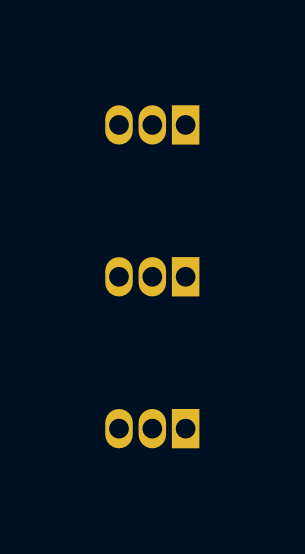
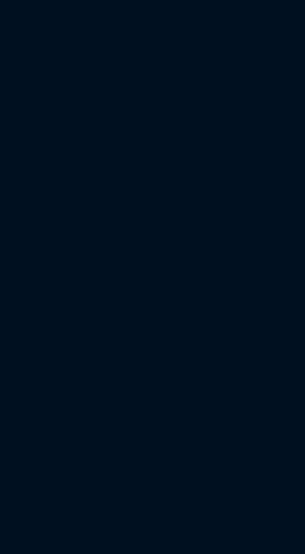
part: (152, 124) -> none
part: (152, 276) -> none
part: (152, 428) -> none

